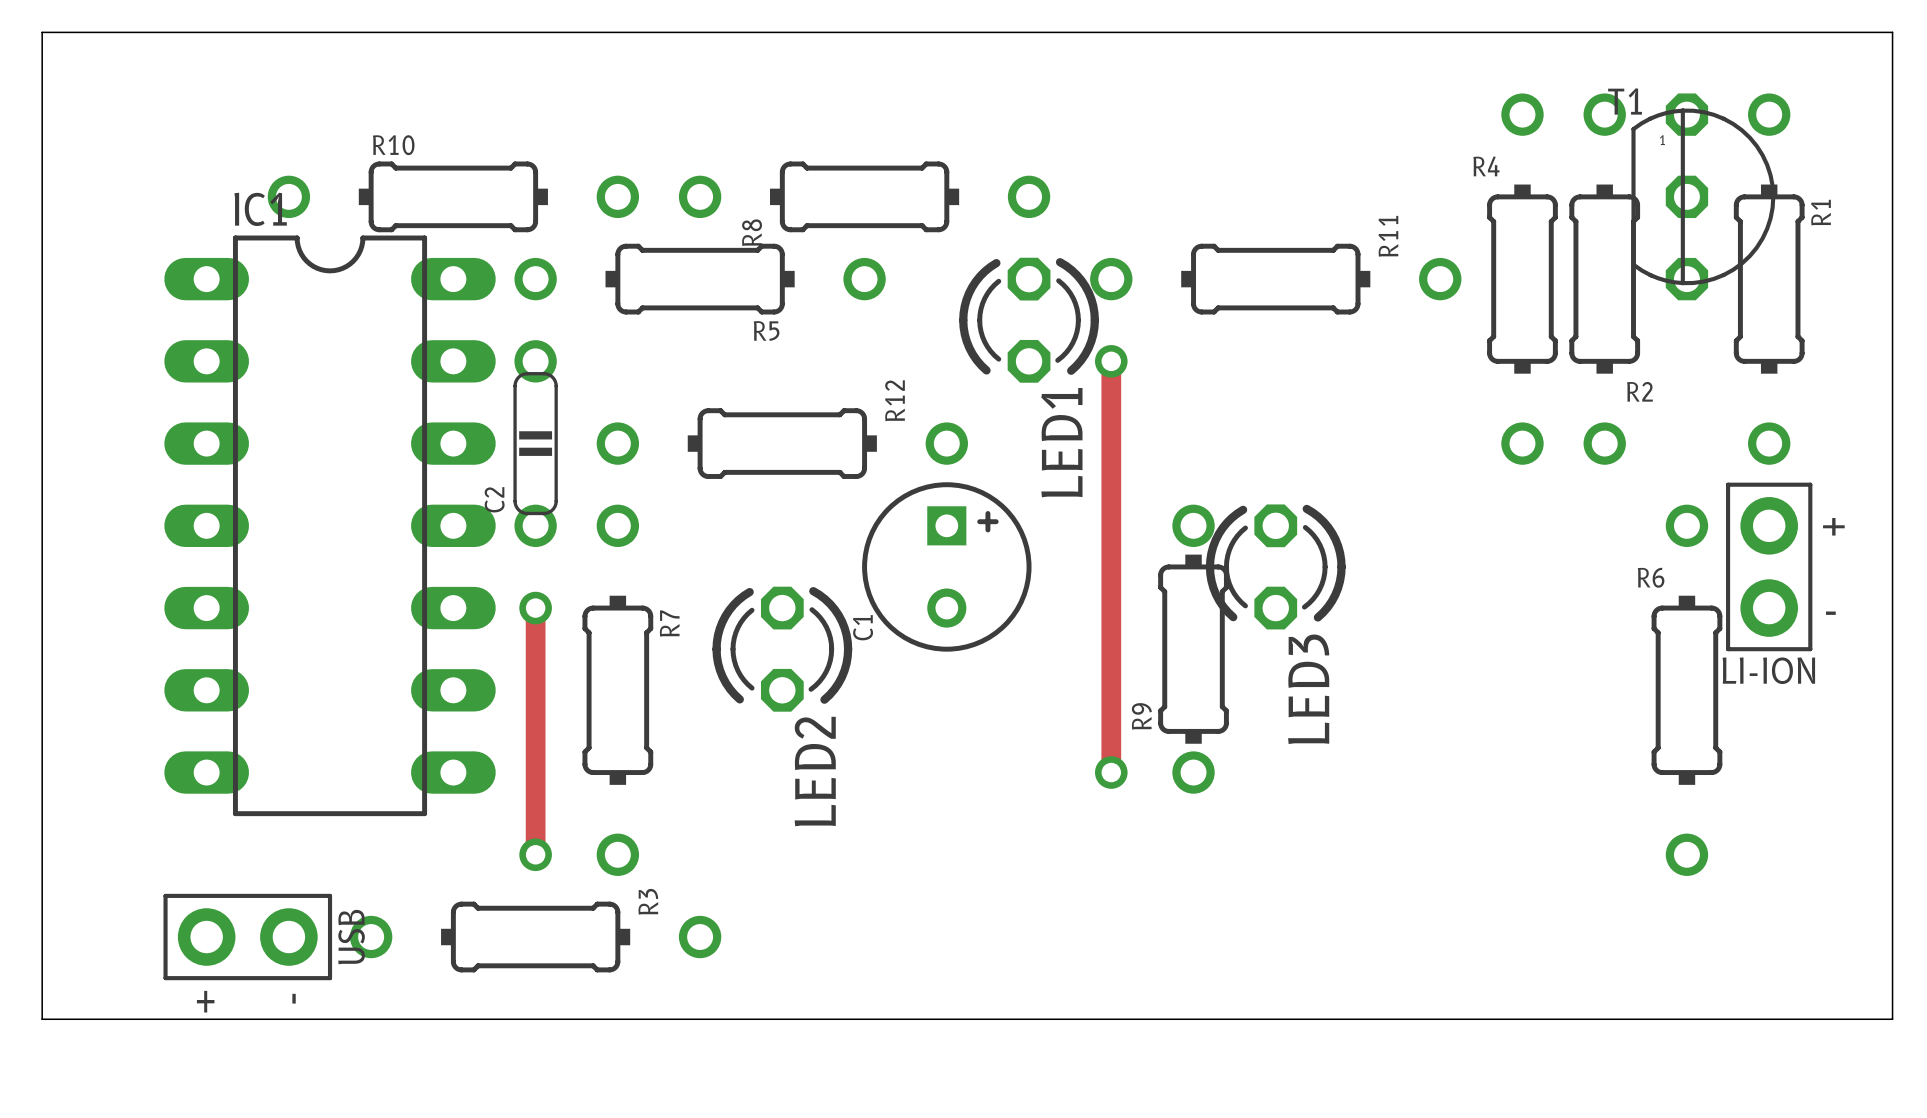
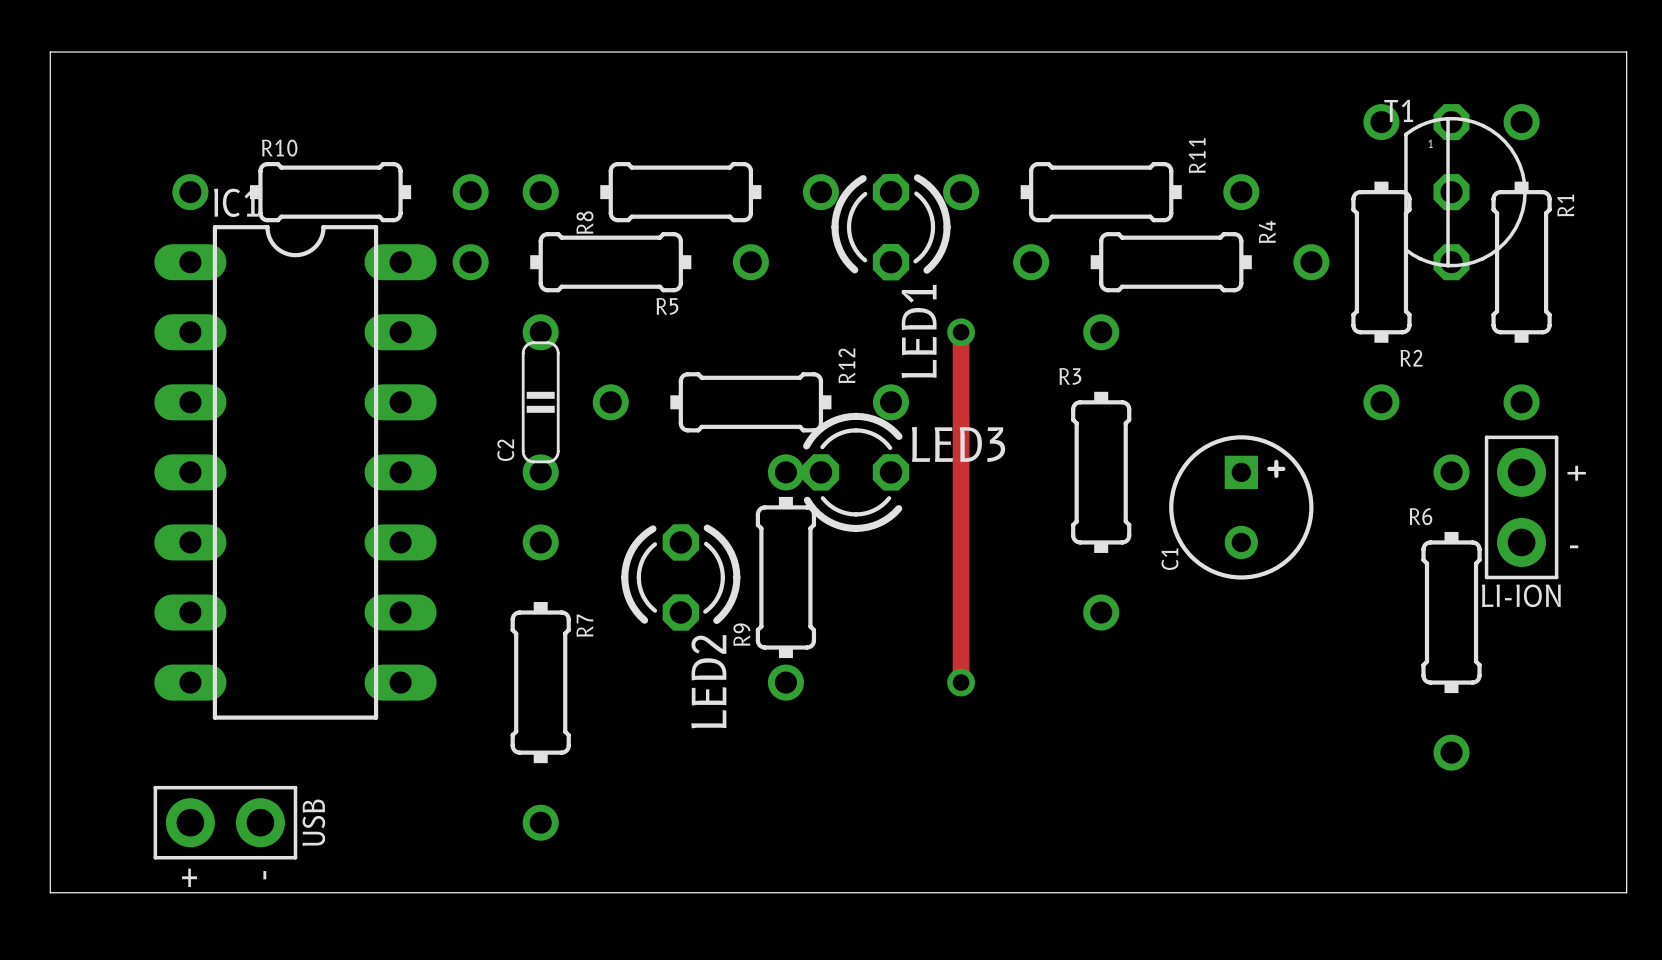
R10 position: (453, 196) -> (330, 192)
R8 position: (864, 196) -> (680, 192)
R11 position: (1275, 279) -> (1101, 192)
R4 rotation: 0° (1522, 279) -> 90° clockwise (1171, 262)
LED1 position: (1029, 320) -> (891, 227)
C2 position: (535, 443) -> (540, 402)
R12 position: (782, 443) -> (750, 402)
C1 position: (946, 566) -> (1241, 507)
LED3 rotation: 0° (1275, 566) -> 90° counterclockwise (855, 472)
LED3 position: (1275, 566) -> (855, 472)
track: (535, 608) (535, 854) -> none
via: (535, 608) -> none
R9 position: (1193, 649) -> (785, 577)
R7 position: (617, 690) -> (540, 682)
via: (535, 854) -> none
R3 name position: R3 (648, 901) -> R3 (1070, 376)
R3 rotation: 0° (535, 937) -> 90° clockwise (1101, 472)
R3 position: (535, 937) -> (1101, 472)

